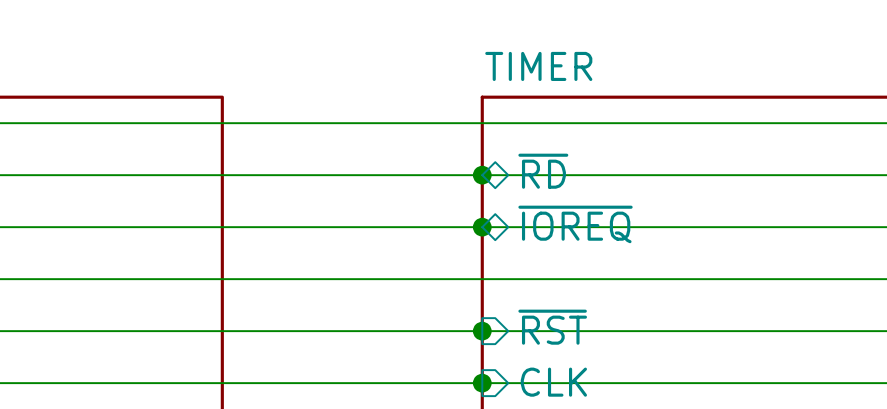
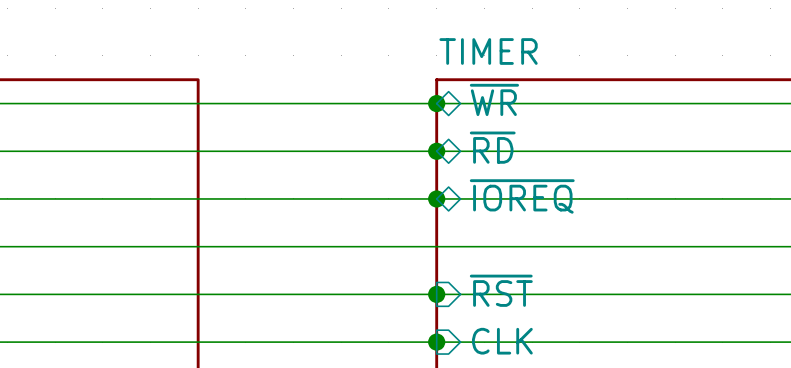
sheet pin: none -> ~{WR} (494, 99)
junction: none -> (436, 103)

